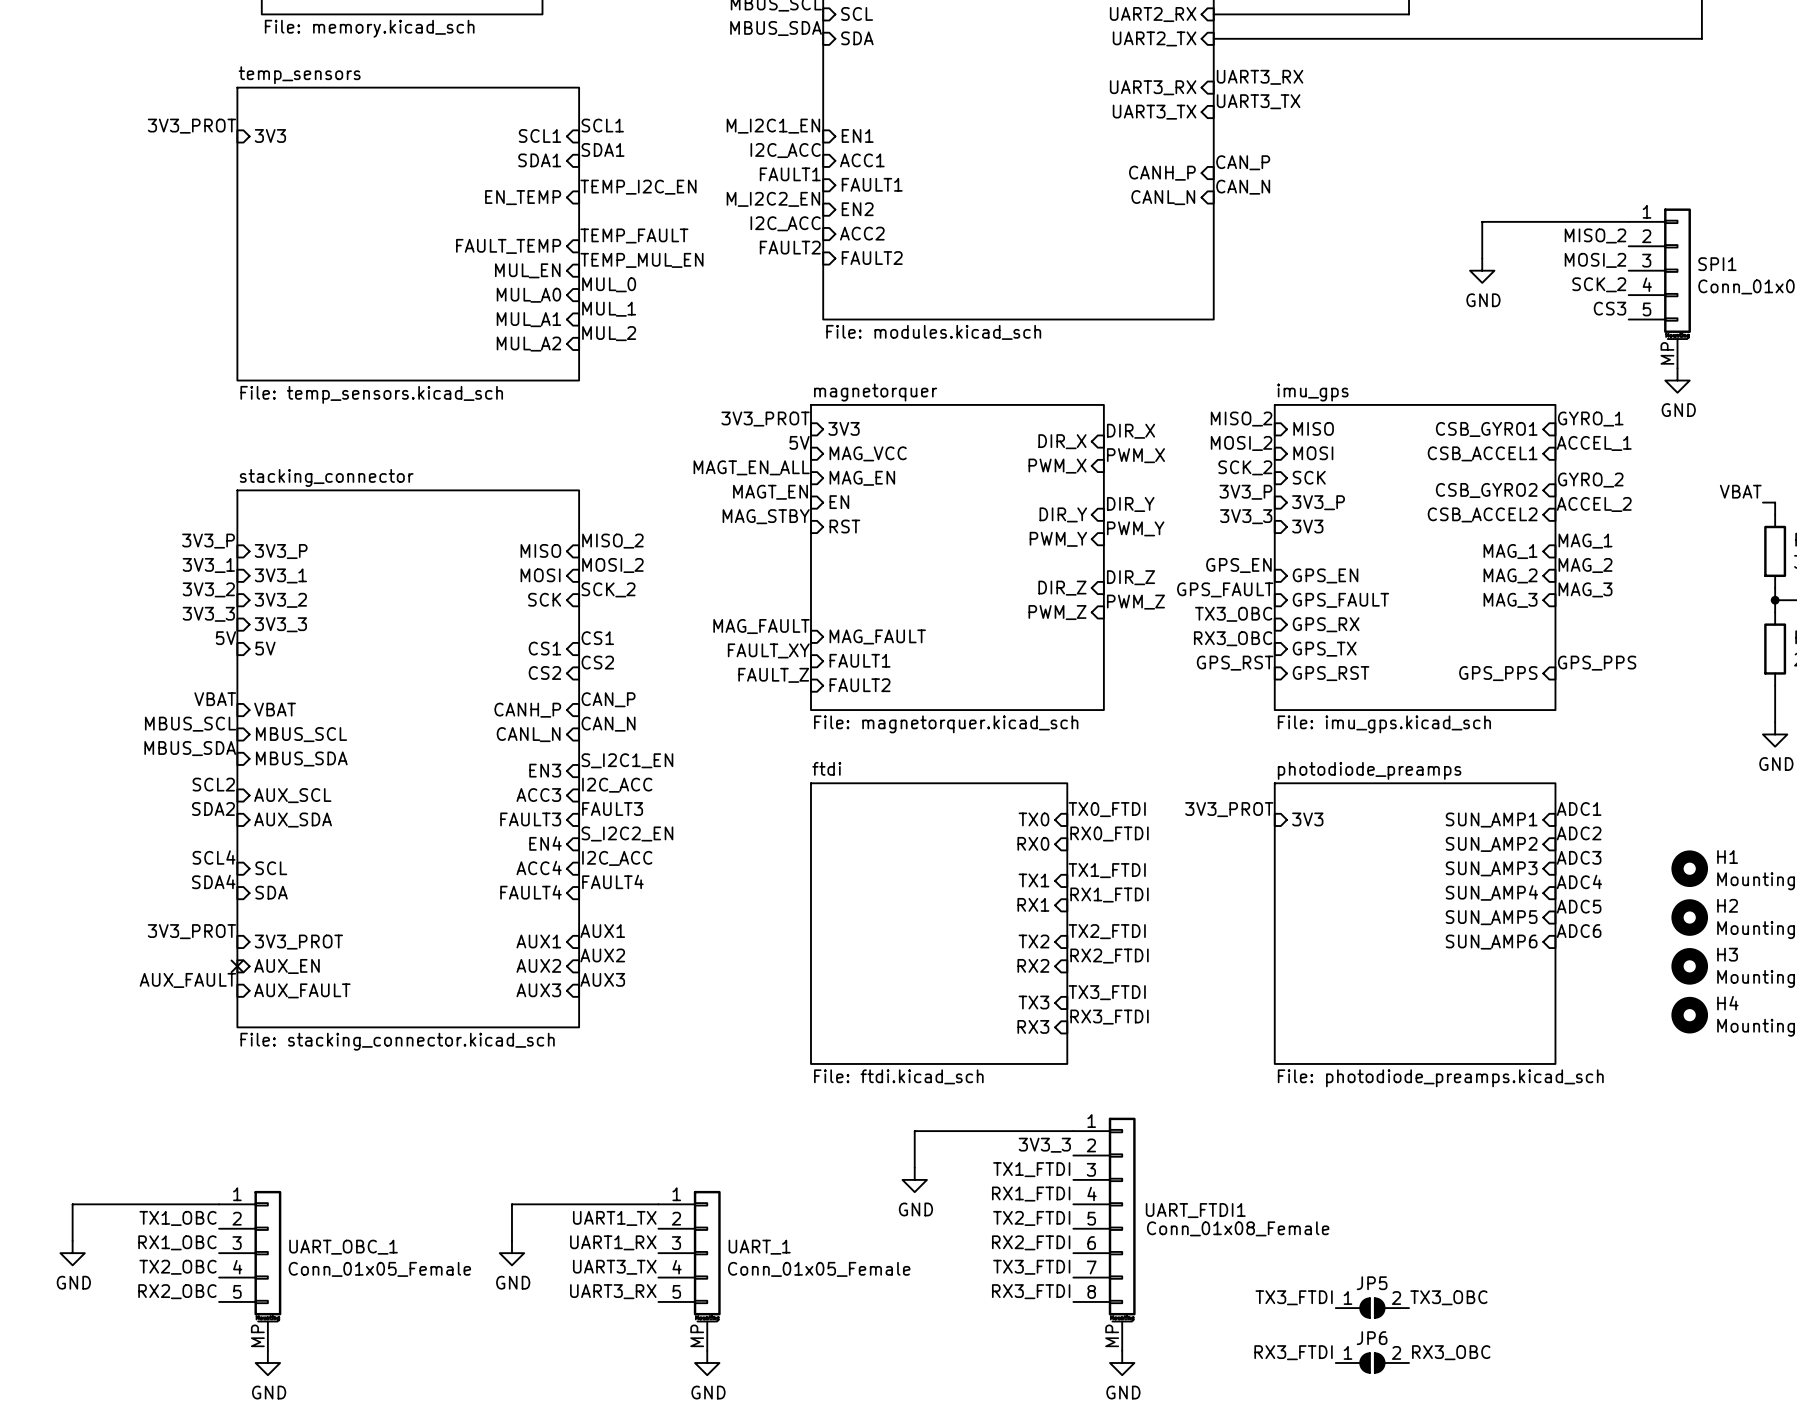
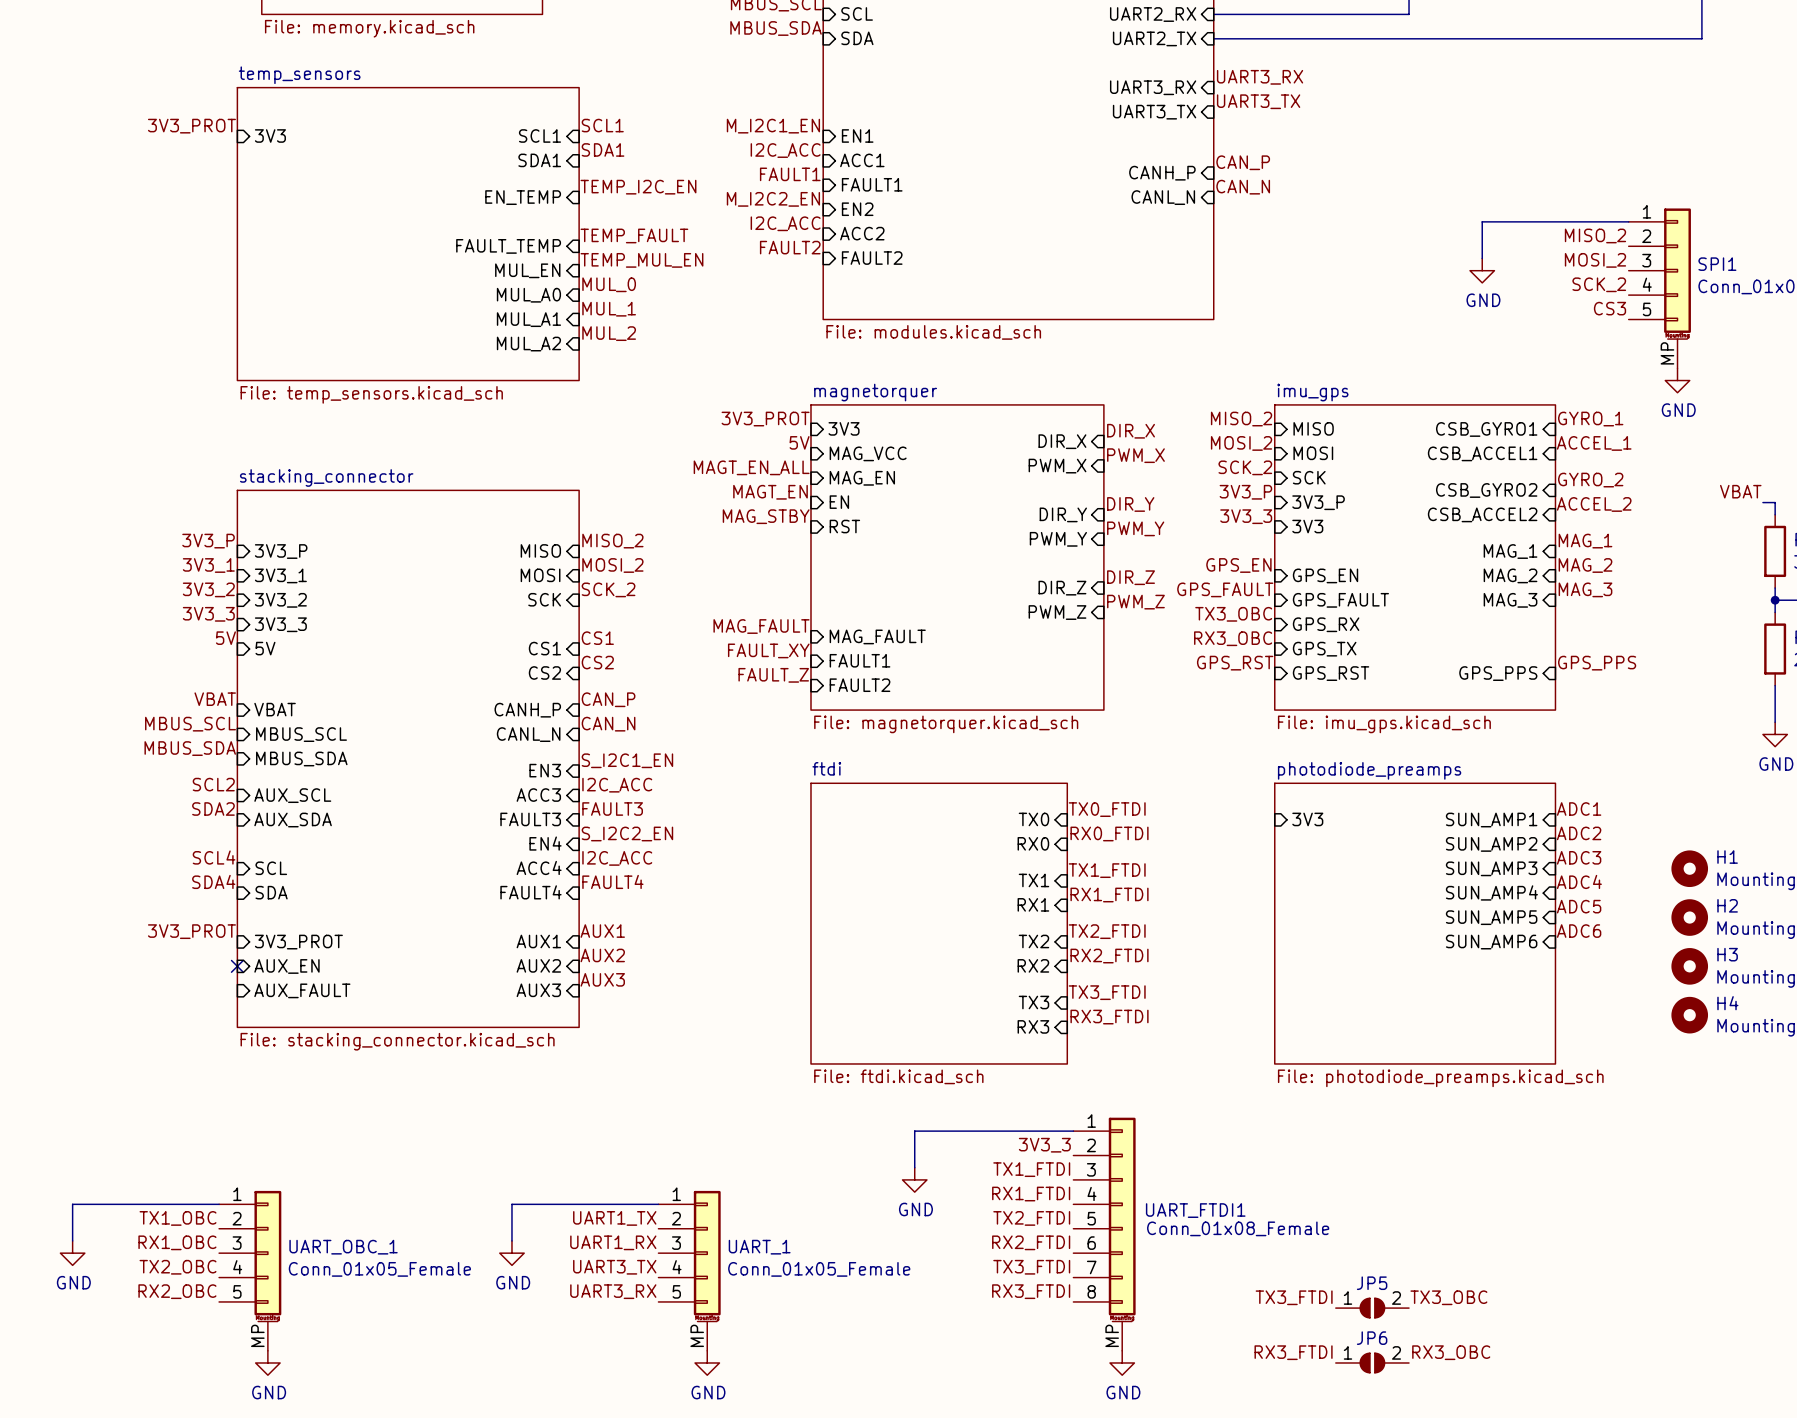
label: 3V3_PROT (1229, 809) -> none
label: AUX_FAULT (187, 980) -> none

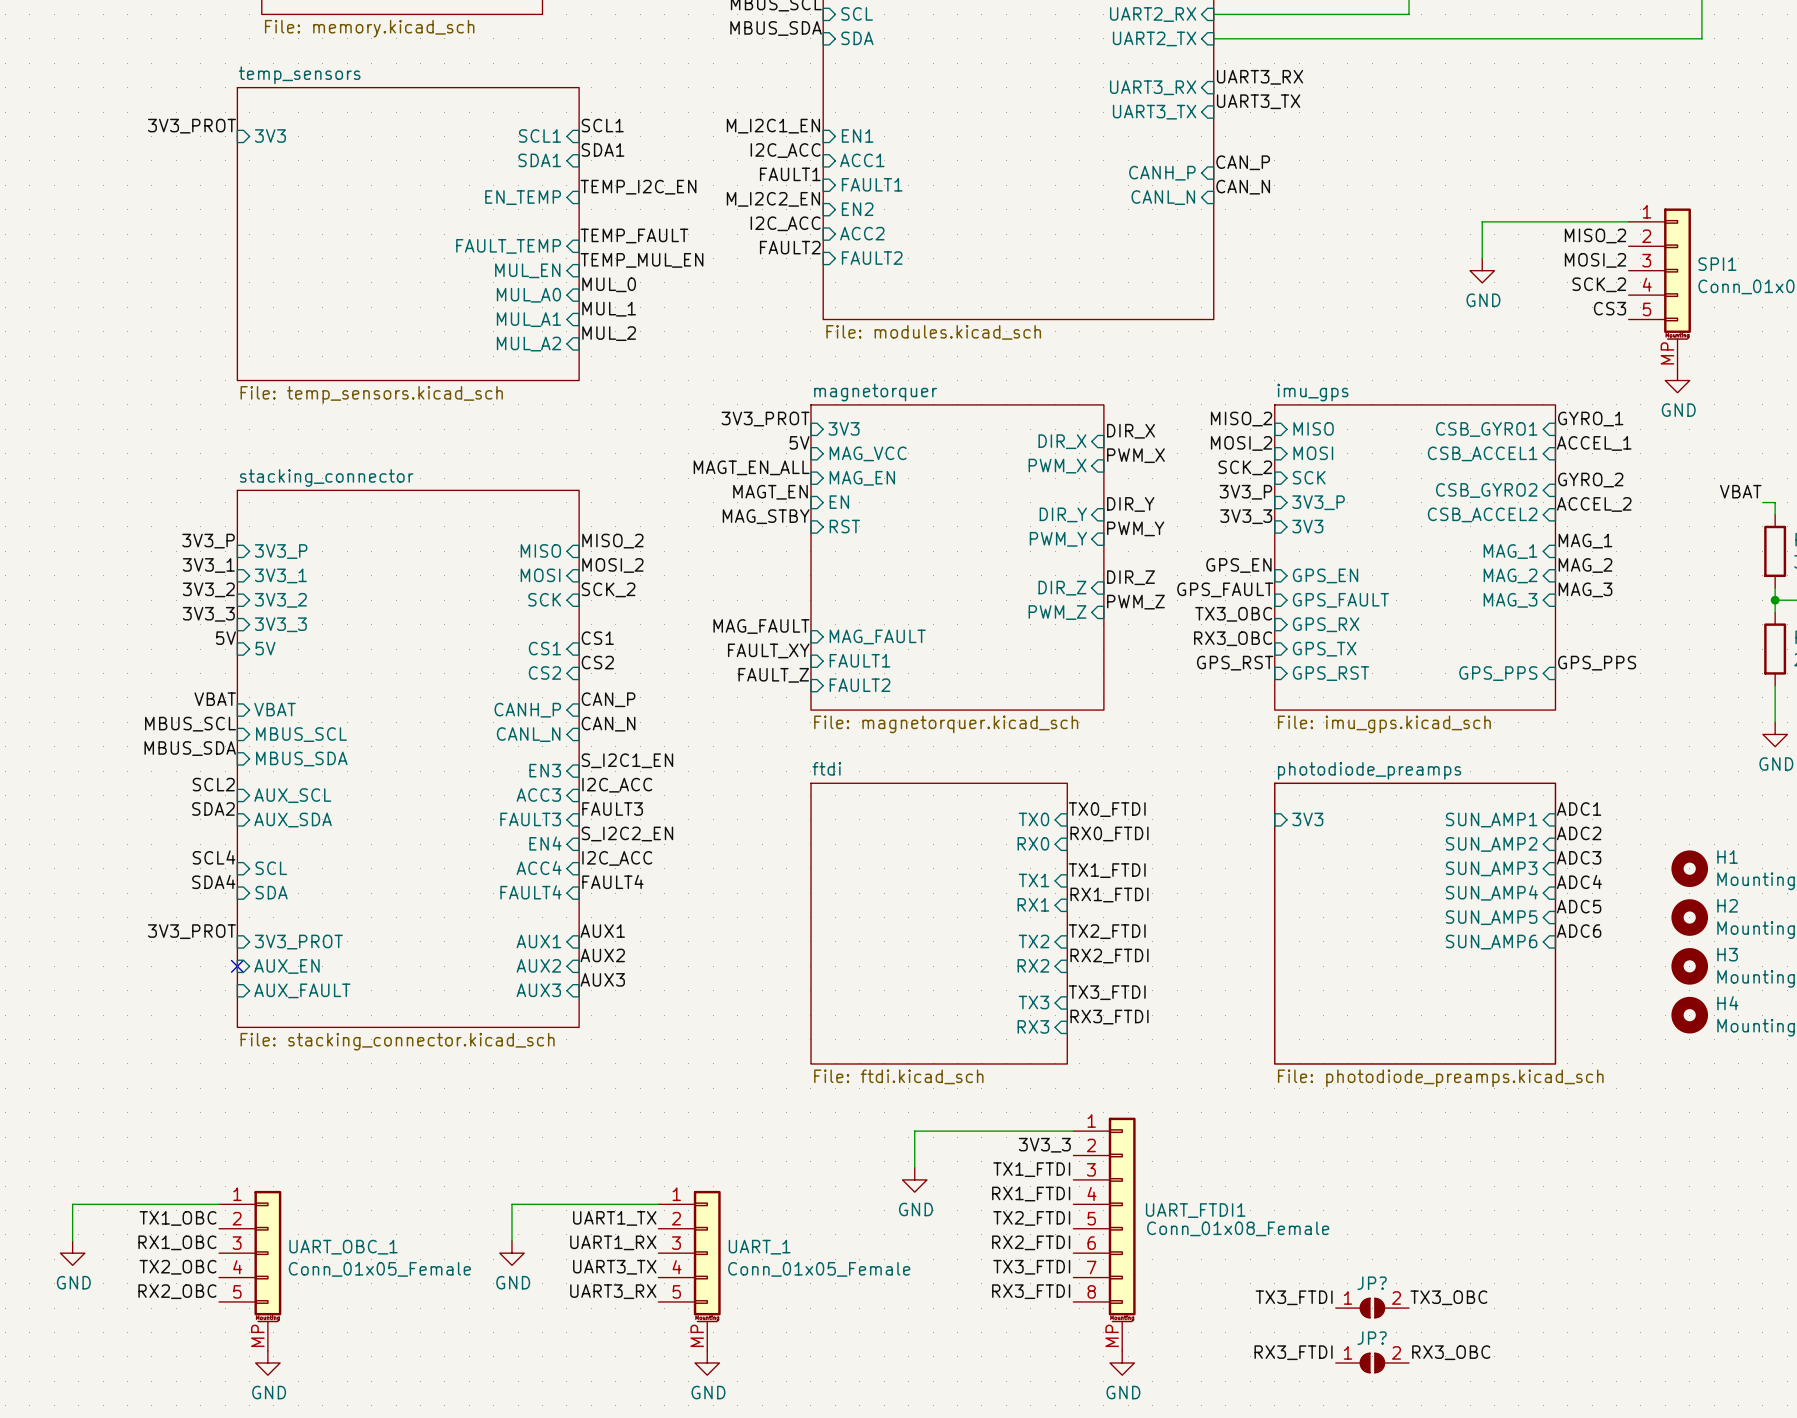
JP5 name: JP5 (1372, 1283) -> JP? (1372, 1283)
JP6 name: JP6 (1372, 1338) -> JP? (1372, 1338)

